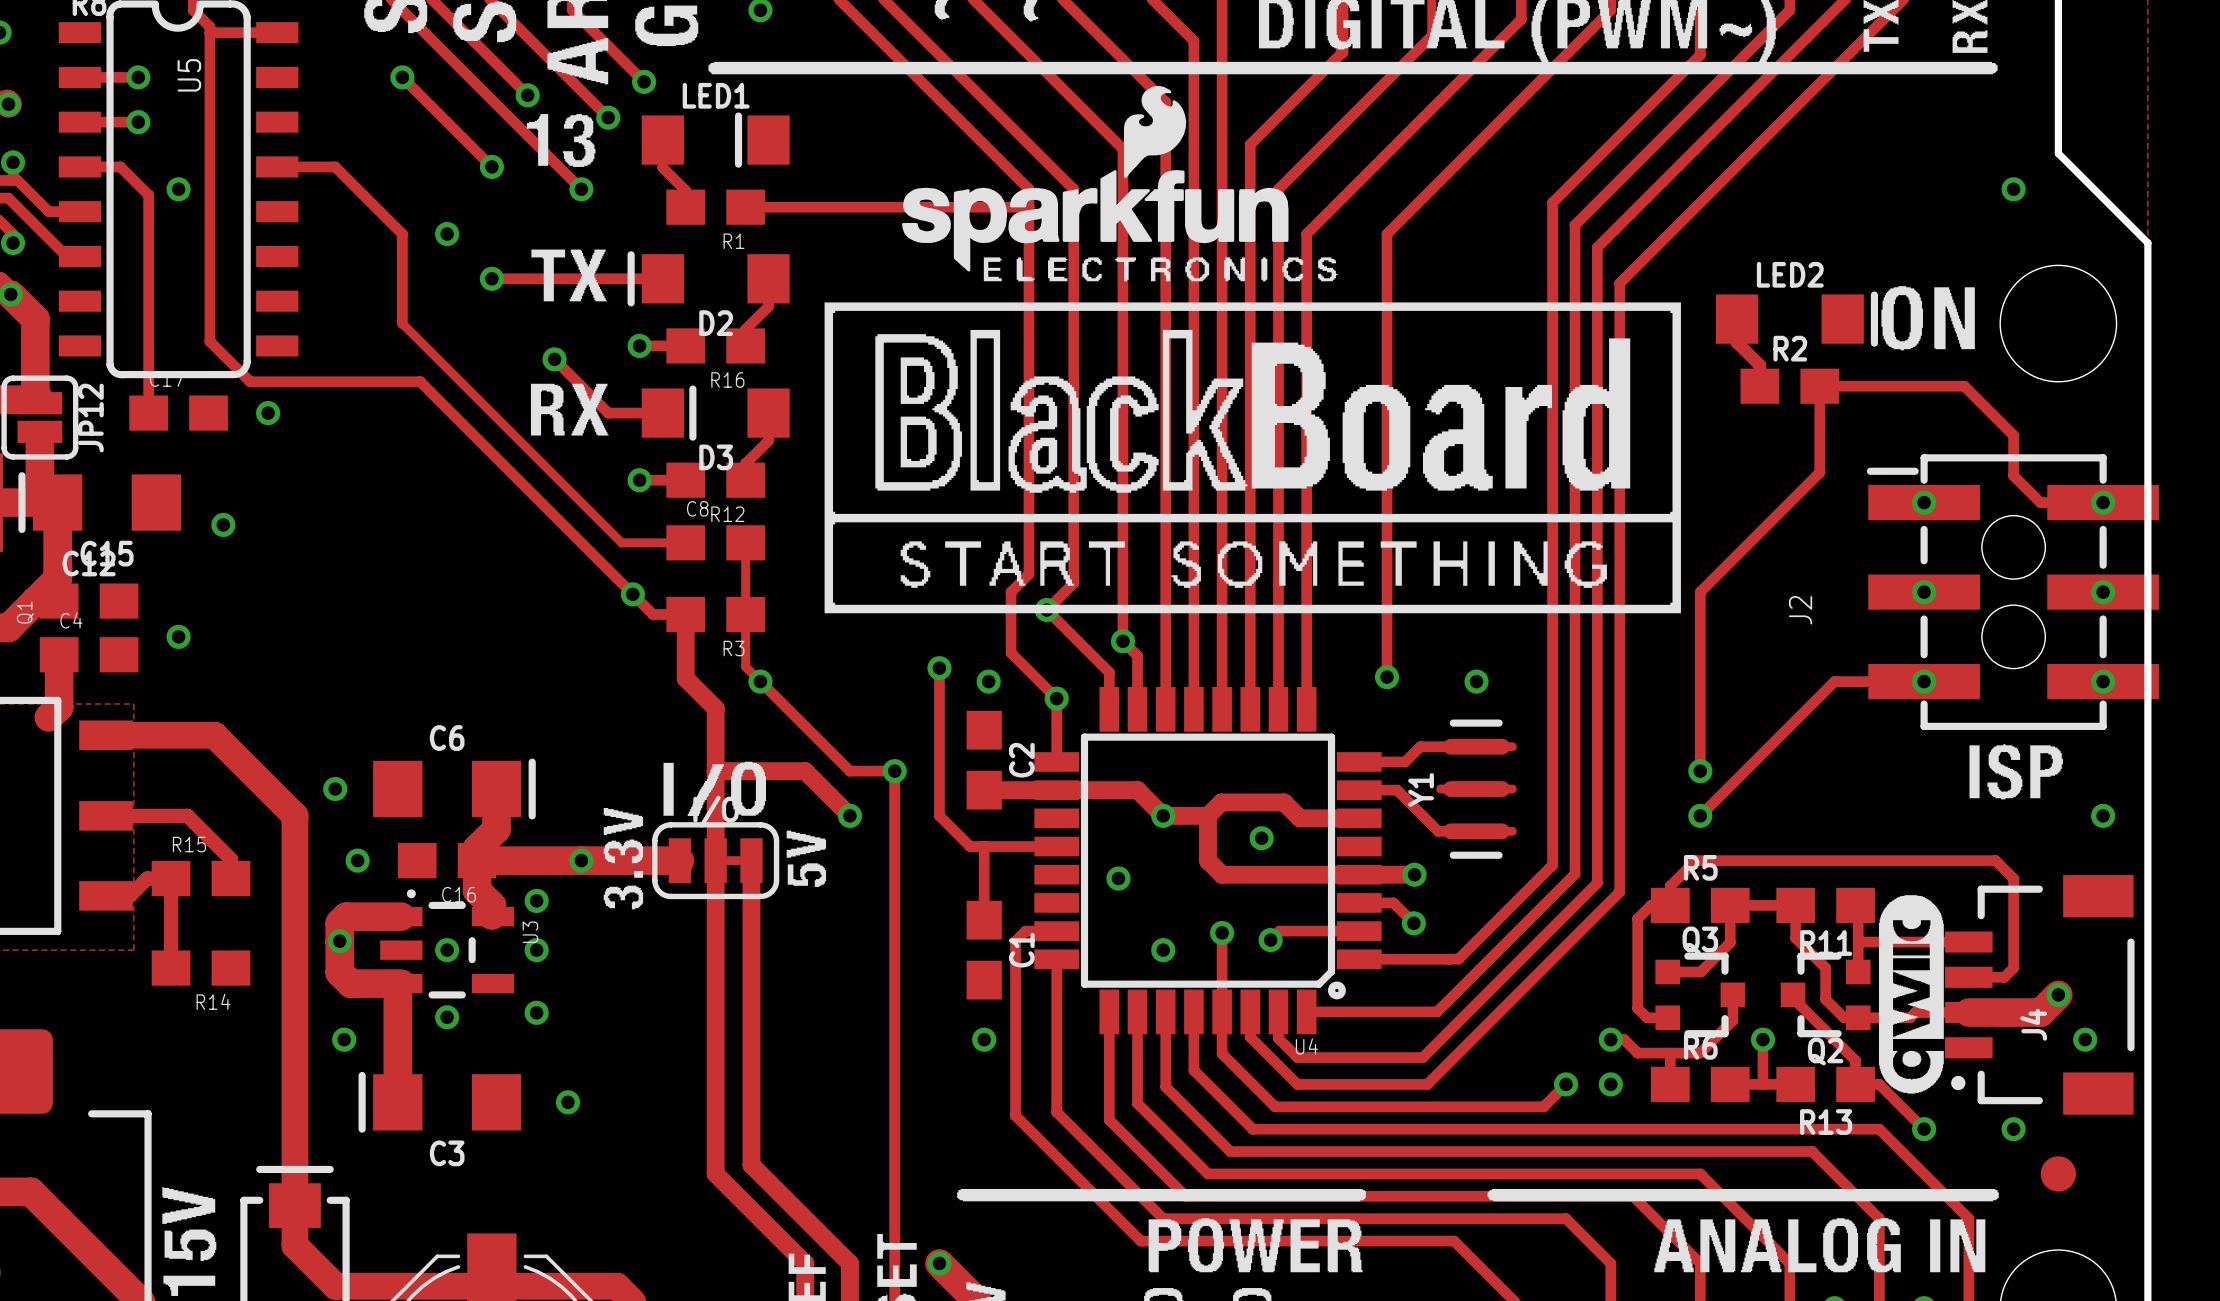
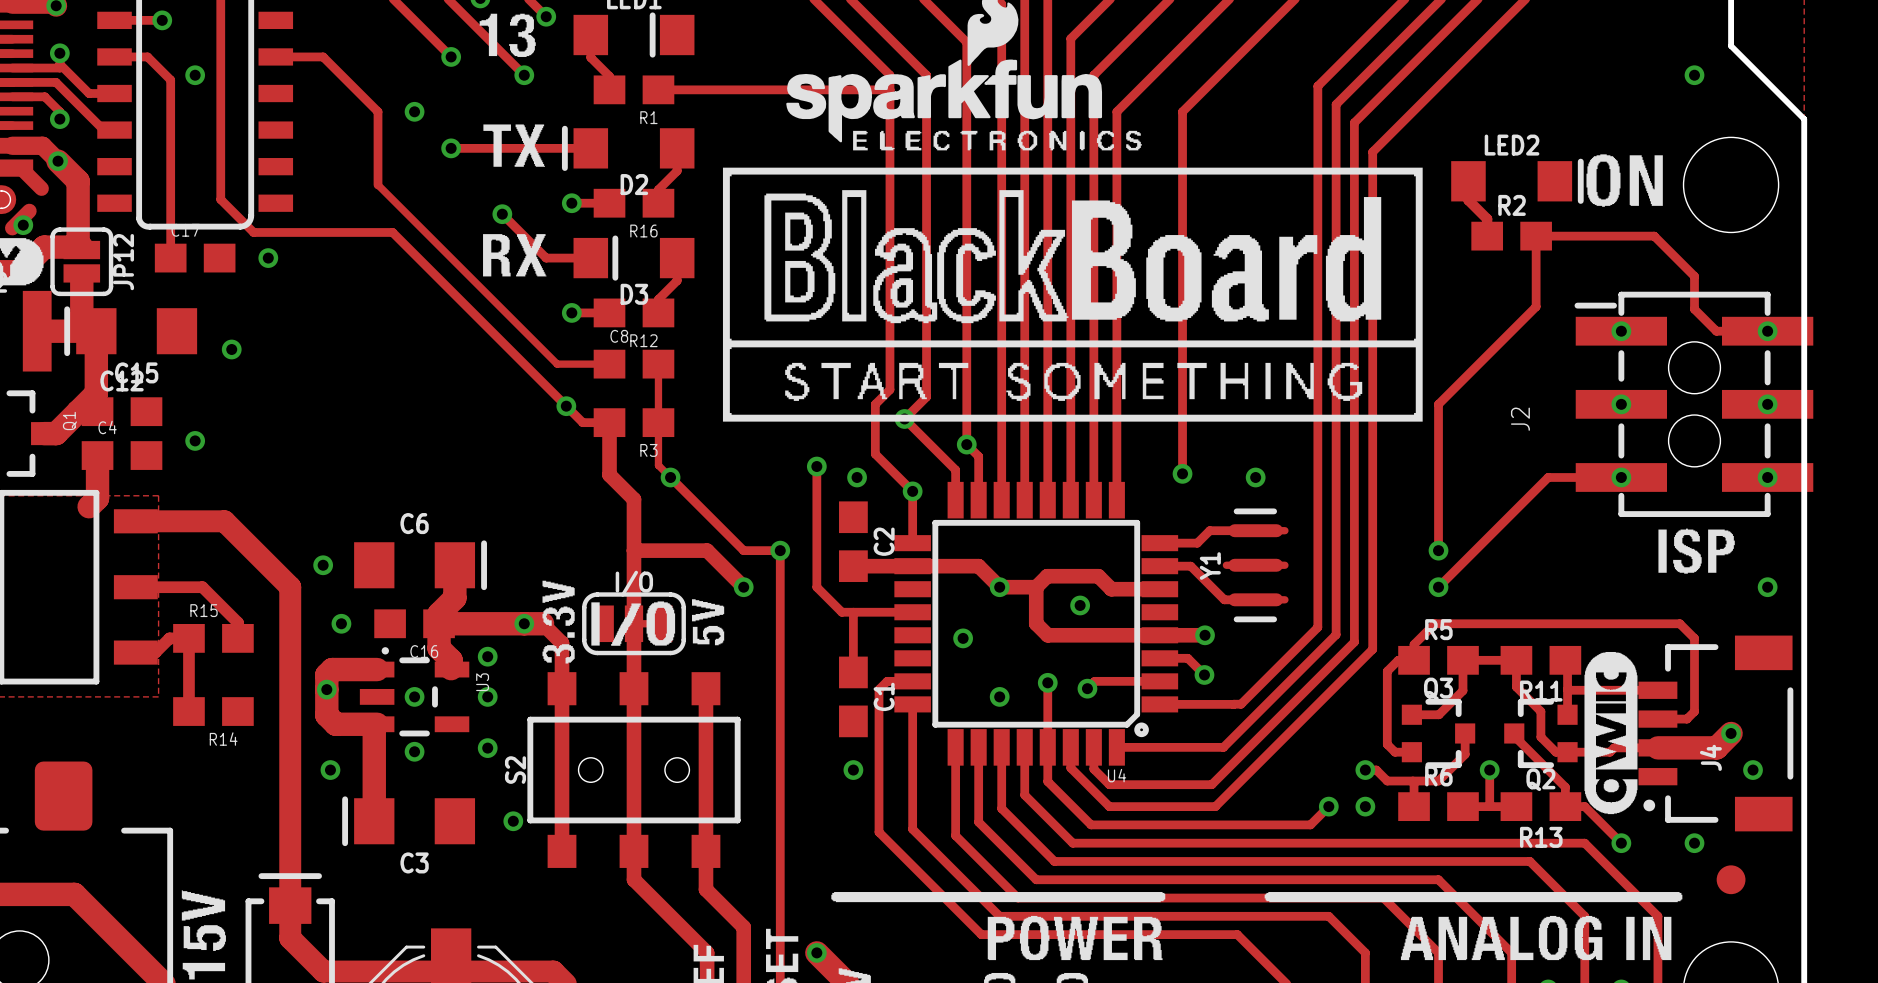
drawing: [663, 761, 767, 816] -> none
drawing position: (748, 763) -> (660, 602)
drawing position: (748, 765) -> (660, 604)
drawing position: (748, 812) -> (660, 603)
drawing position: (748, 814) -> (660, 644)
drawing position: (748, 815) -> (660, 645)
drawing: none -> [591, 601, 676, 646]
track: (603, 860) (679, 860) -> (542, 623) (562, 643) (562, 851)
track: (751, 860) (751, 1164) (849, 1263) -> (705, 688) (705, 889) (743, 927) (743, 952)
S2: none -> (633, 770)

